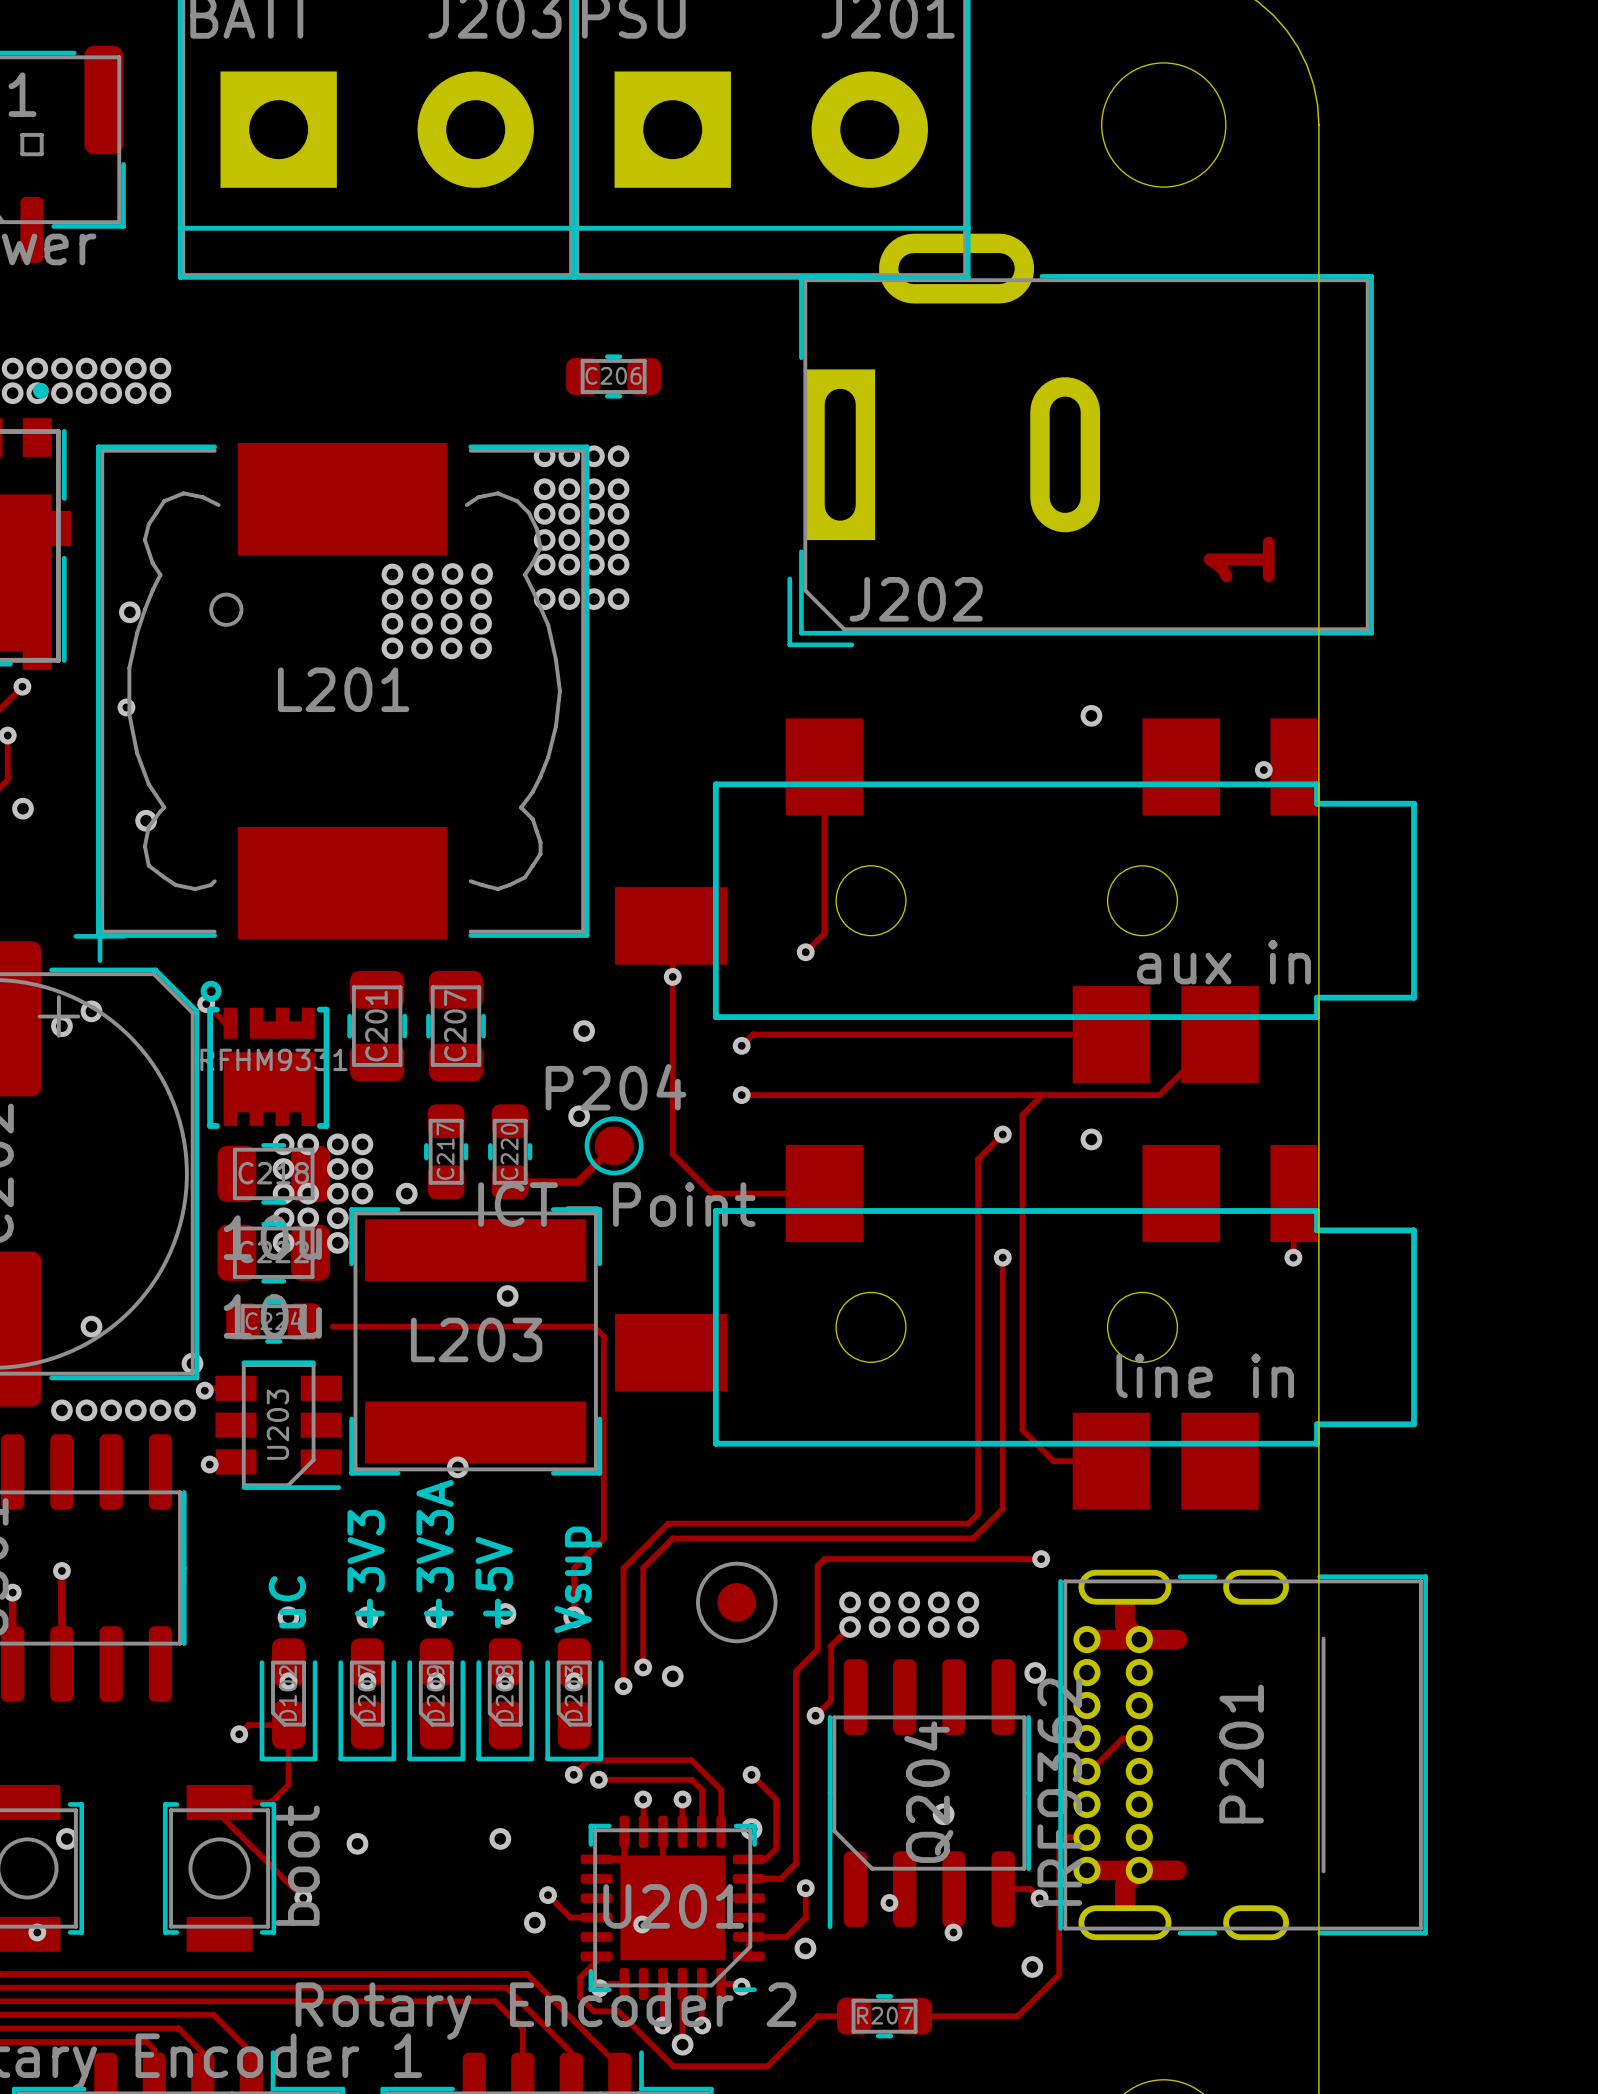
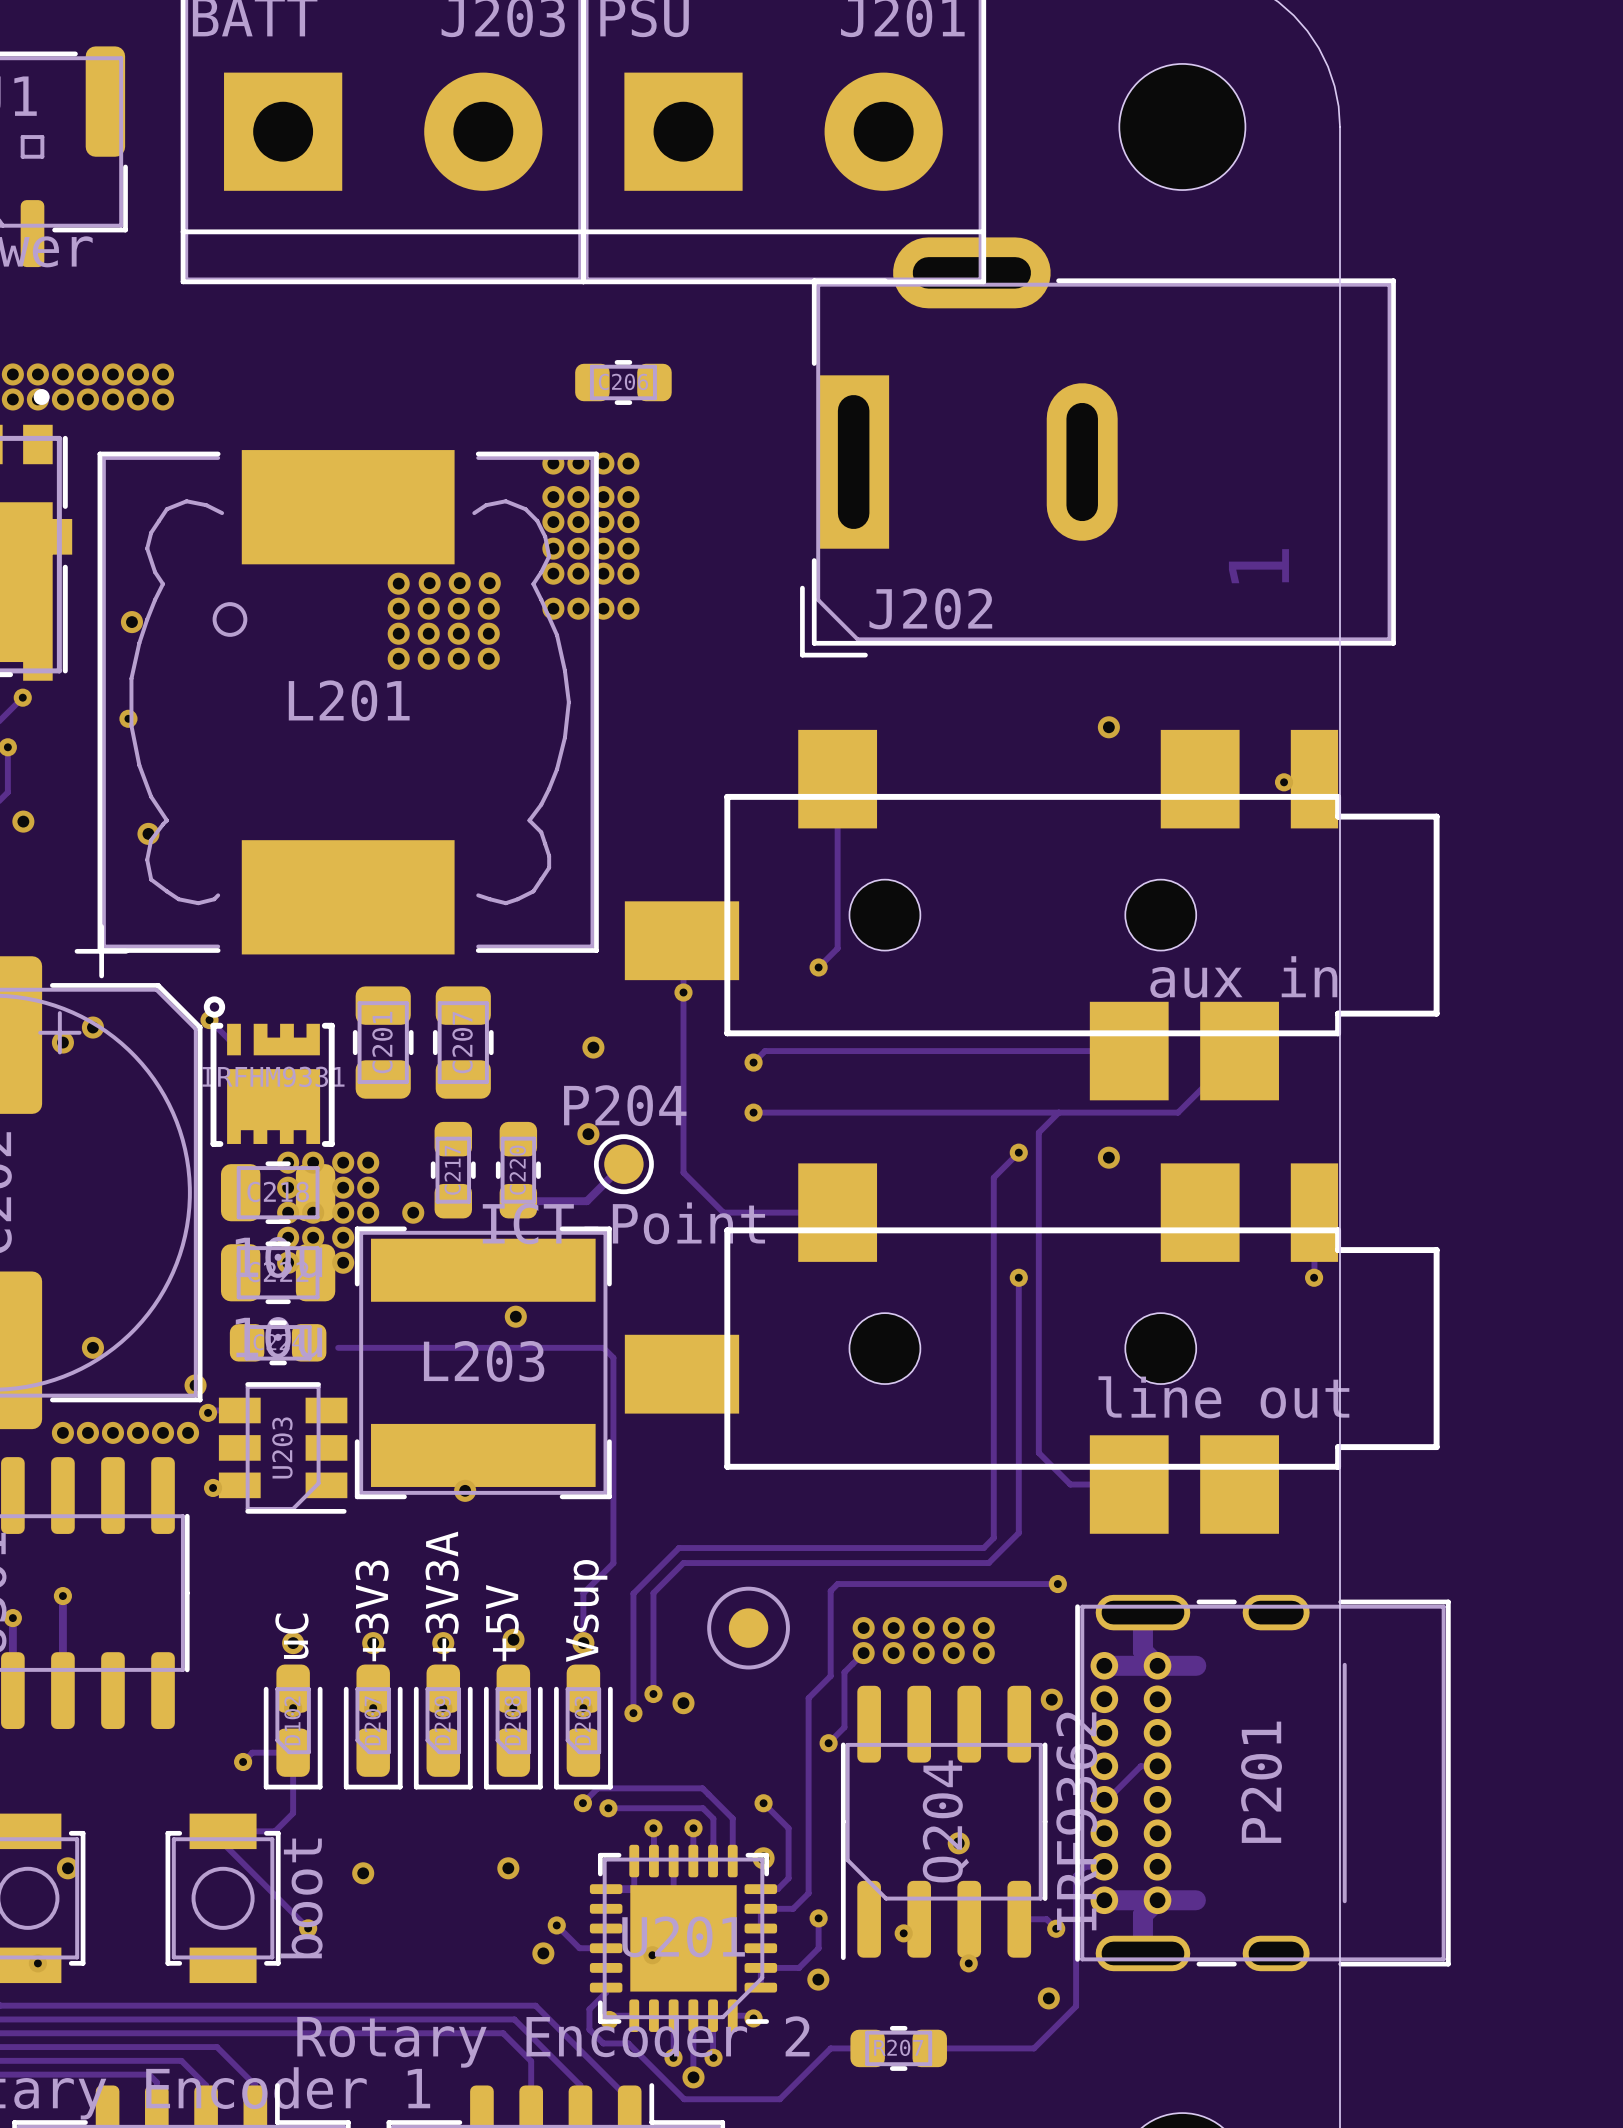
part value: line in (1205, 1375) -> line out (1223, 1397)

